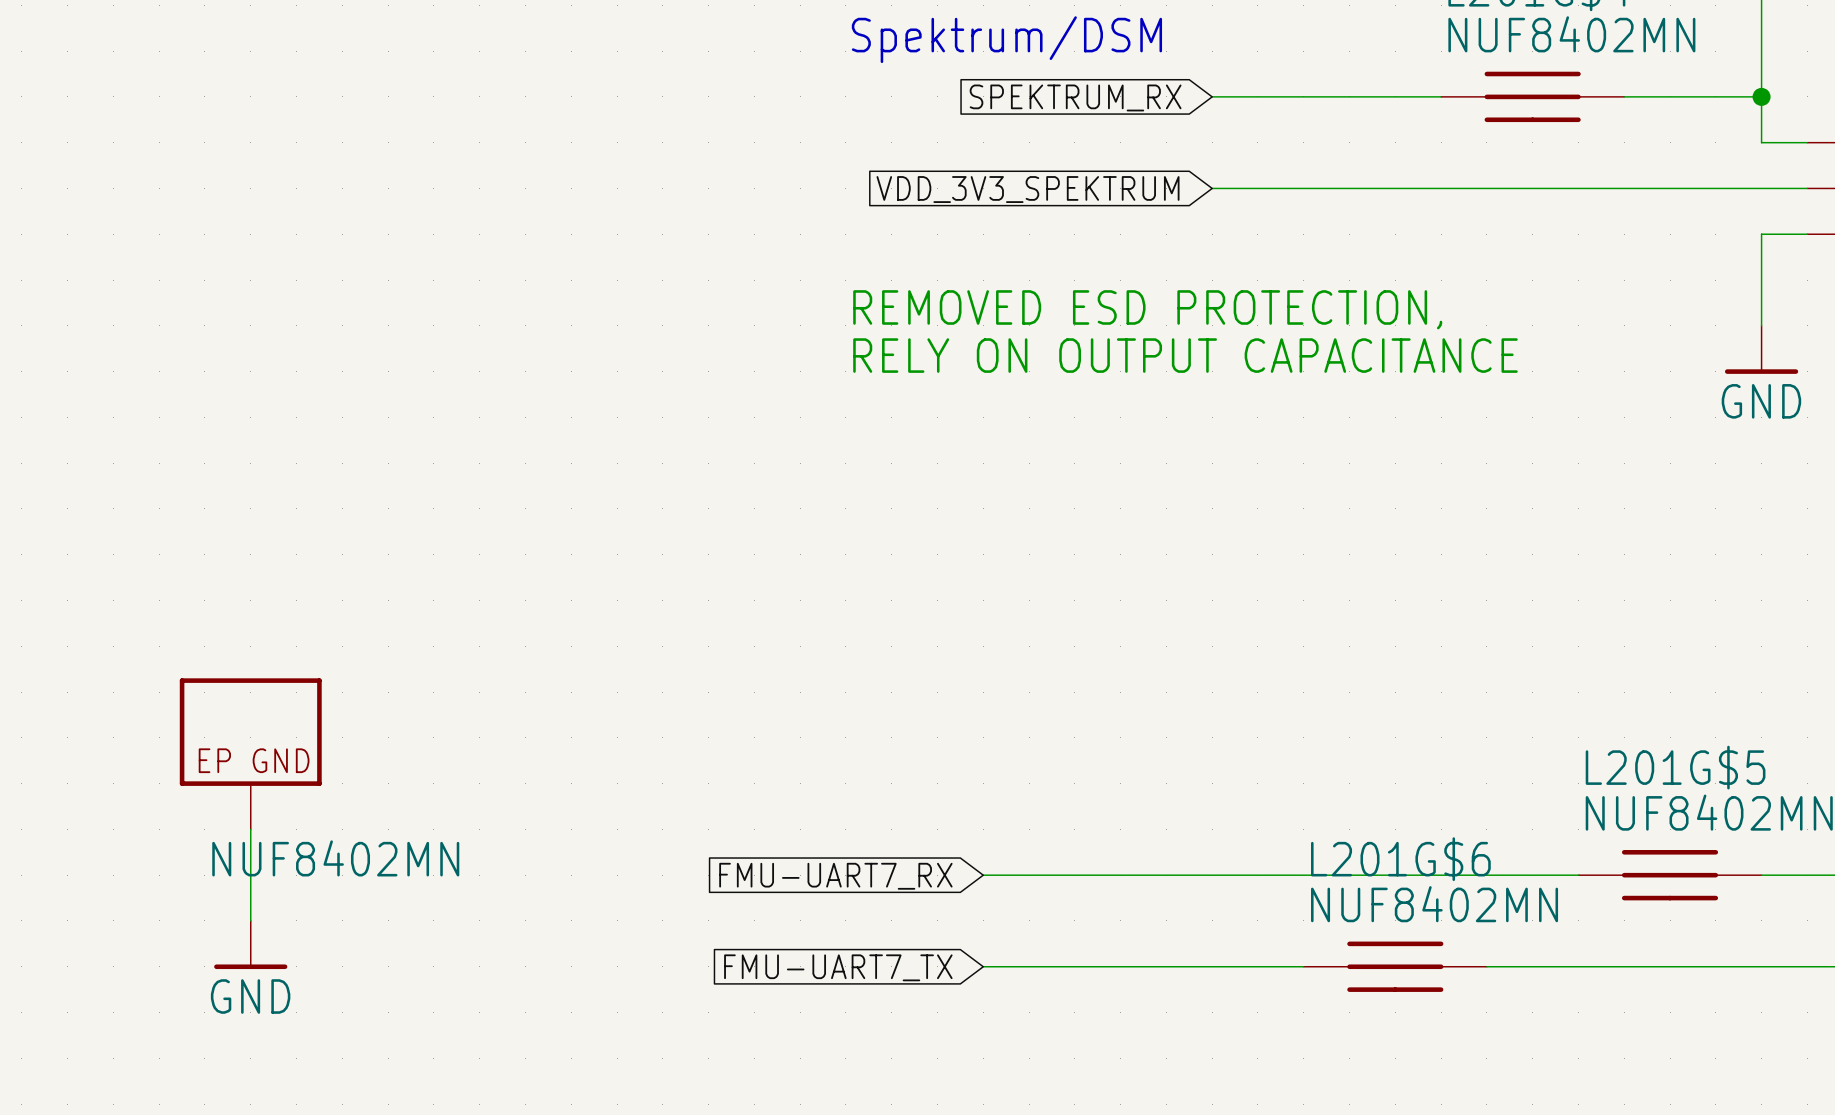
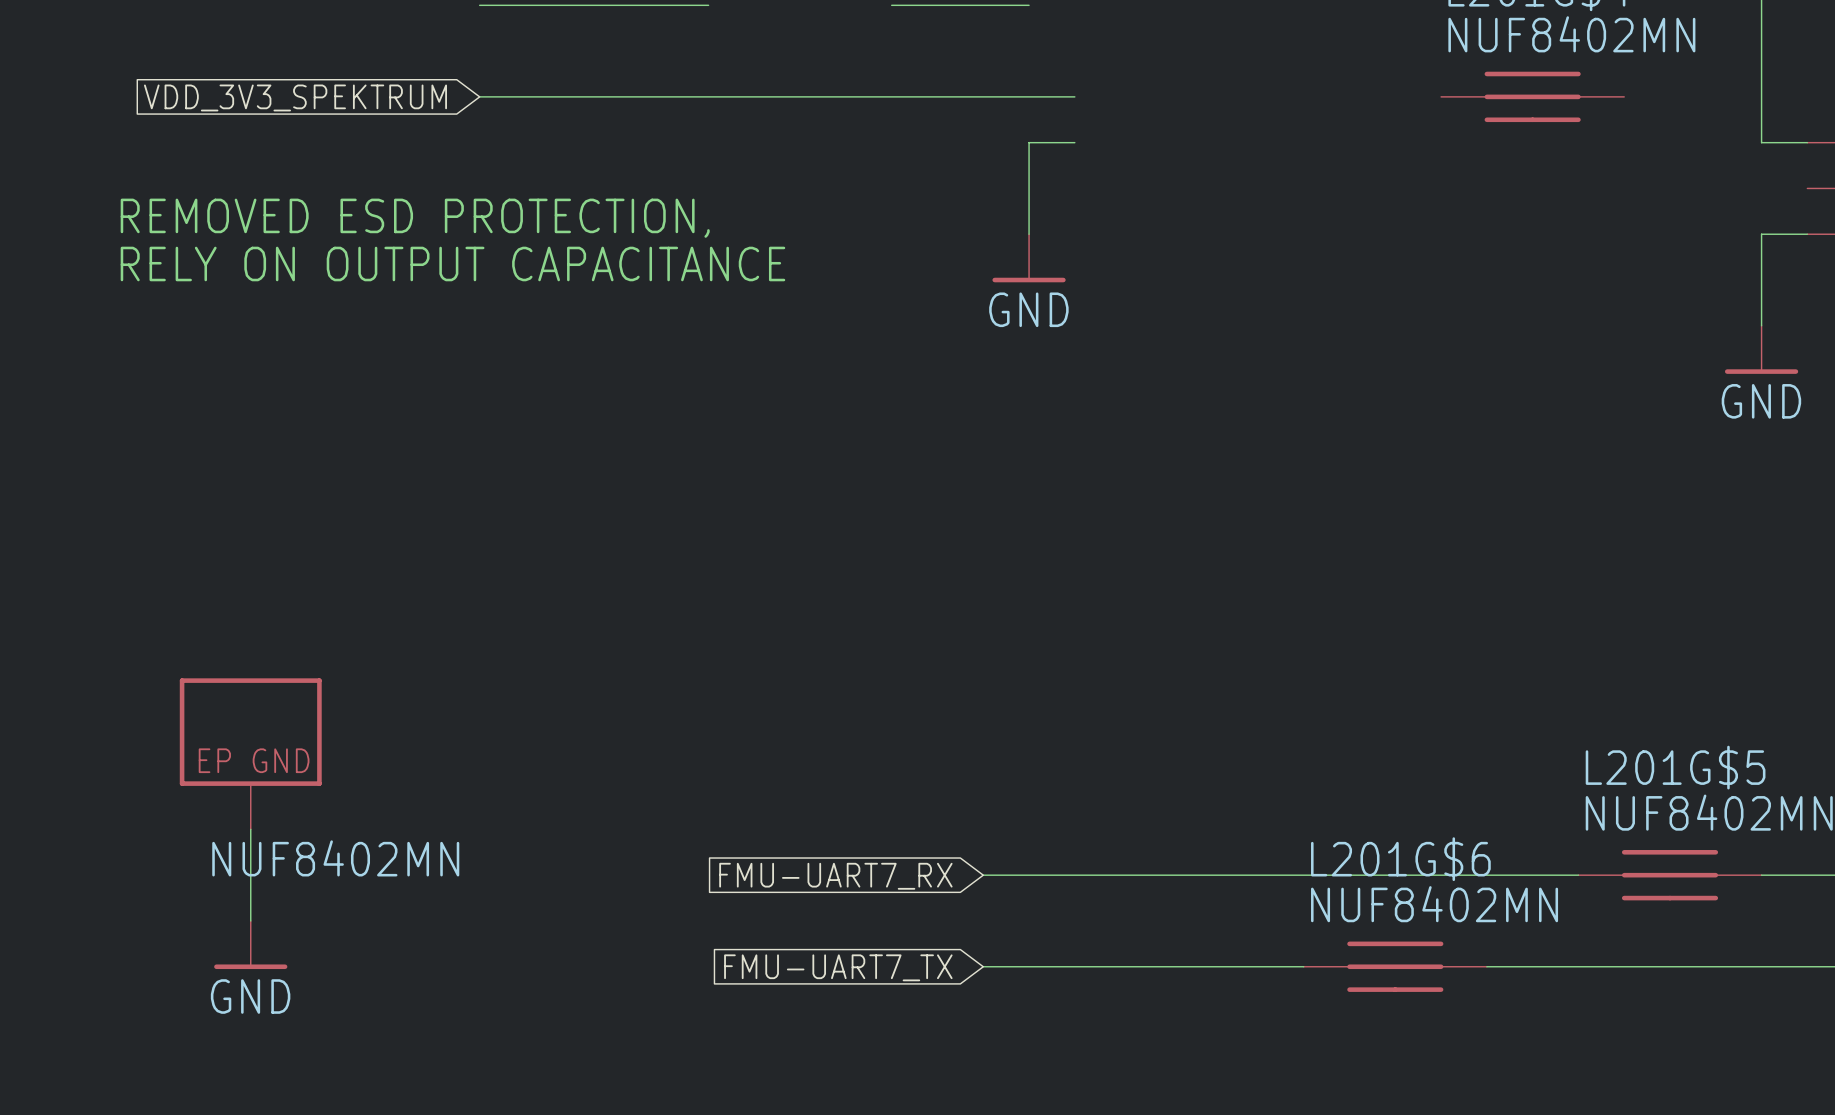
wire: none -> (479, 5) (708, 5)
wire: none -> (891, 5) (1029, 5)
text: Spektrum/DSM (1006, 39) -> none
wire: none -> (479, 96) (1074, 96)
wire: (1212, 96) (1441, 96) -> none
wire: (1624, 96) (1761, 96) -> none
junction: (1761, 96) -> none
global label: none -> VDD_3V3_SPEKTRUM (295, 97)
global label: SPEKTRUM_RX (1075, 97) -> none
wire: none -> (1074, 142) (1029, 142) (1029, 234)
wire: (1212, 188) (1807, 188) -> none
global label: VDD_3V3_SPEKTRUM (1028, 189) -> none
text: none -> REMOVED ESD PROTECTION, (415, 218)
power symbol: none -> GND (1029, 258)
text: none -> RELY ON OUTPUT CAPACITANCE (452, 263)
text: REMOVED ESD PROTECTION, (1147, 309) -> none
text: RELY ON OUTPUT CAPACITANCE (1185, 355) -> none

